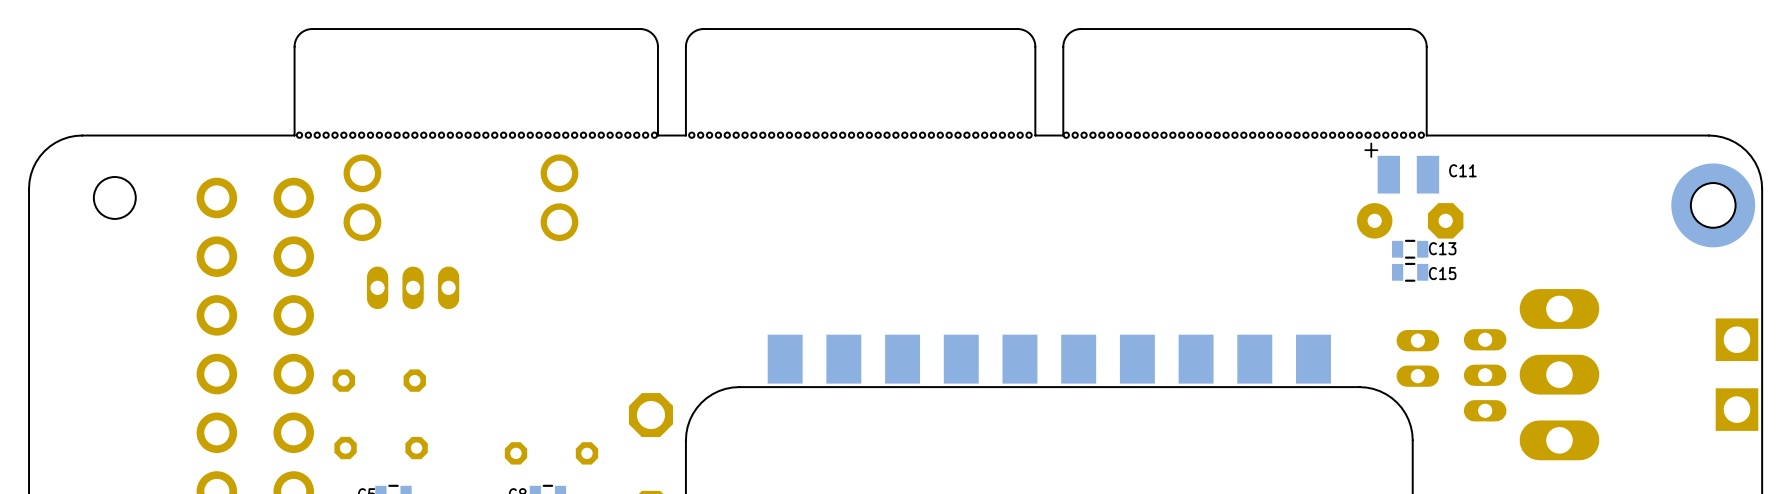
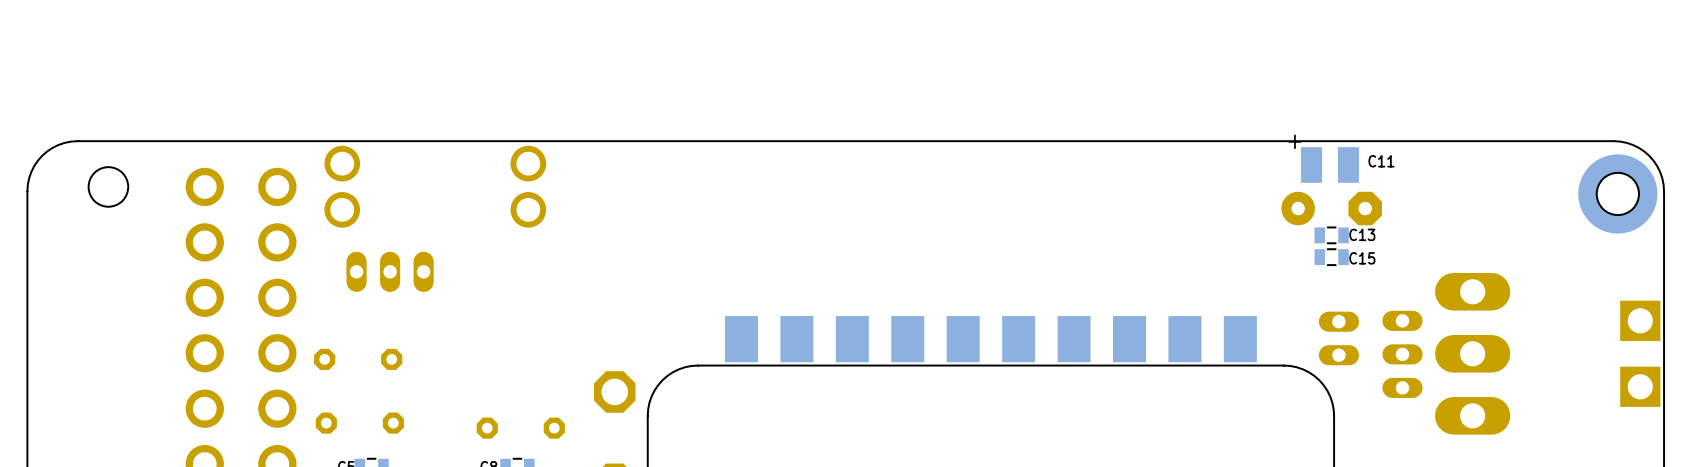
hole: (299, 135) -> none
hole: (308, 135) -> none
hole: (317, 135) -> none
hole: (326, 135) -> none
hole: (334, 135) -> none
hole: (343, 135) -> none
hole: (352, 135) -> none
hole: (361, 135) -> none
hole: (370, 135) -> none
hole: (379, 135) -> none
hole: (388, 135) -> none
hole: (397, 135) -> none
hole: (405, 135) -> none
hole: (414, 135) -> none
hole: (423, 135) -> none
hole: (432, 135) -> none
hole: (441, 135) -> none
hole: (450, 135) -> none
hole: (459, 135) -> none
hole: (468, 135) -> none
hole: (477, 135) -> none
hole: (485, 135) -> none
hole: (494, 135) -> none
hole: (503, 135) -> none
hole: (512, 135) -> none
hole: (521, 135) -> none
hole: (530, 135) -> none
hole: (539, 135) -> none
hole: (548, 135) -> none
hole: (556, 135) -> none
hole: (565, 135) -> none
hole: (574, 135) -> none
hole: (583, 135) -> none
hole: (592, 135) -> none
hole: (601, 135) -> none
hole: (610, 135) -> none
hole: (619, 135) -> none
hole: (627, 135) -> none
hole: (636, 135) -> none
hole: (645, 135) -> none
hole: (654, 135) -> none
hole: (691, 135) -> none
hole: (700, 135) -> none
hole: (709, 135) -> none
hole: (718, 135) -> none
hole: (727, 135) -> none
hole: (736, 135) -> none
hole: (745, 135) -> none
hole: (753, 135) -> none
hole: (762, 135) -> none
hole: (771, 135) -> none
hole: (780, 135) -> none
hole: (789, 135) -> none
hole: (798, 135) -> none
hole: (807, 135) -> none
hole: (816, 135) -> none
hole: (824, 135) -> none
hole: (833, 135) -> none
hole: (842, 135) -> none
hole: (851, 135) -> none
hole: (860, 135) -> none
hole: (869, 135) -> none
hole: (878, 135) -> none
hole: (887, 135) -> none
hole: (895, 135) -> none
hole: (904, 135) -> none
hole: (913, 135) -> none
hole: (922, 135) -> none
hole: (931, 135) -> none
hole: (940, 135) -> none
hole: (949, 135) -> none
hole: (958, 135) -> none
hole: (966, 135) -> none
hole: (975, 135) -> none
hole: (984, 135) -> none
hole: (993, 135) -> none
hole: (1002, 135) -> none
hole: (1011, 135) -> none
hole: (1020, 135) -> none
hole: (1029, 135) -> none
hole: (1066, 135) -> none
hole: (1075, 135) -> none
hole: (1084, 135) -> none
hole: (1092, 135) -> none
hole: (1101, 135) -> none
hole: (1110, 135) -> none
hole: (1119, 135) -> none
hole: (1128, 135) -> none
hole: (1137, 135) -> none
hole: (1146, 135) -> none
hole: (1155, 135) -> none
hole: (1163, 135) -> none
hole: (1172, 135) -> none
hole: (1181, 135) -> none
hole: (1190, 135) -> none
hole: (1199, 135) -> none
hole: (1208, 135) -> none
hole: (1217, 135) -> none
hole: (1226, 135) -> none
hole: (1234, 135) -> none
hole: (1243, 135) -> none
hole: (1252, 135) -> none
hole: (1261, 135) -> none
hole: (1270, 135) -> none
hole: (1279, 135) -> none
hole: (1288, 135) -> none
hole: (1297, 135) -> none
hole: (1305, 135) -> none
hole: (1314, 135) -> none
hole: (1323, 135) -> none
hole: (1332, 135) -> none
hole: (1341, 135) -> none
hole: (1350, 135) -> none
hole: (1359, 135) -> none
hole: (1368, 135) -> none
hole: (1376, 135) -> none
hole: (1385, 135) -> none
hole: (1394, 135) -> none
hole: (1403, 135) -> none
hole: (1412, 135) -> none
hole: (1421, 135) -> none
board edge: (1762, 202) (1761, 181) (1755, 162) (1741, 146) (1722, 137) (1708, 135) (1426, 135) (1426, 44) (1419, 32) (1408, 29) (1076, 29) (1066, 35) (1063, 44) (1063, 135) (1035, 135) (1035, 44) (1030, 34) (1019, 29) (699, 29) (689, 35) (686, 44) (685, 135) (657, 135) (657, 44) (654, 35) (644, 29) (310, 29) (299, 34) (294, 44) (294, 135) (82, 135) (68, 137) (49, 146) (36, 162) (29, 181) (29, 202) -> (1664, 191) (1660, 172) (1649, 155) (1633, 145) (1613, 141) (77, 141) (58, 145) (42, 155) (31, 172) (27, 191)

